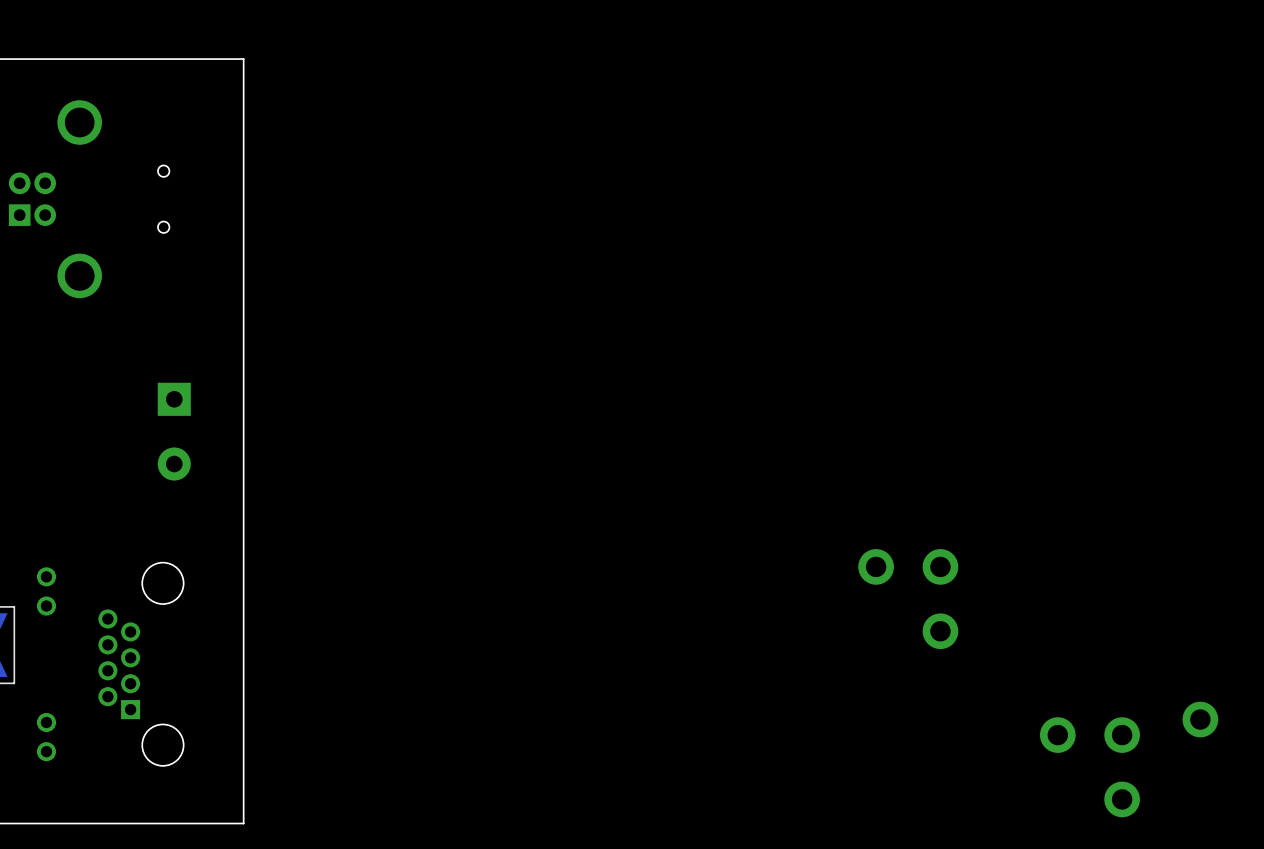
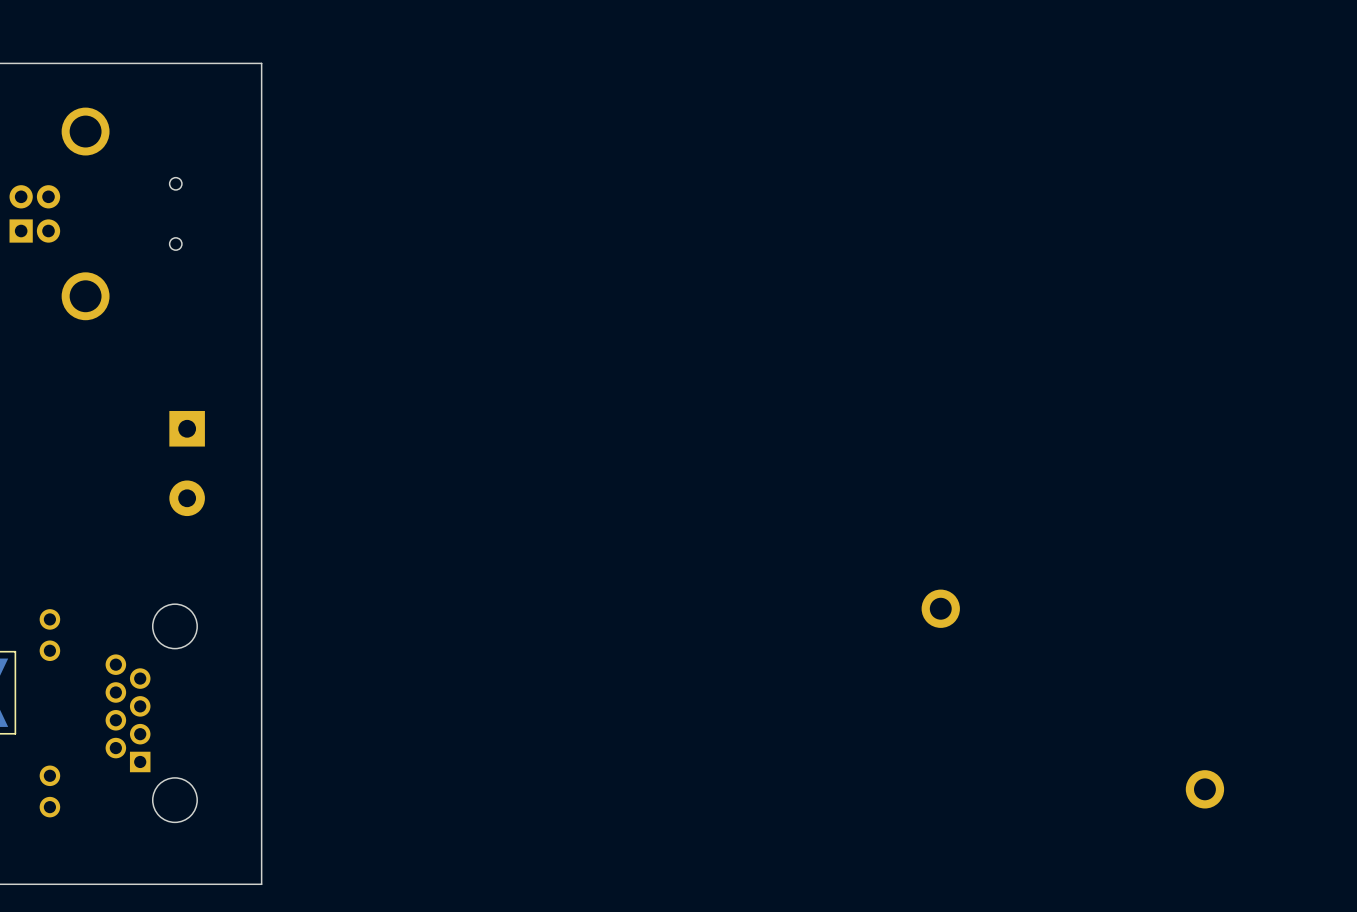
part: (940, 566) -> none
part: (940, 631) -> none
part: (1200, 719) -> none
part: (1057, 735) -> none
part: (1122, 799) -> none

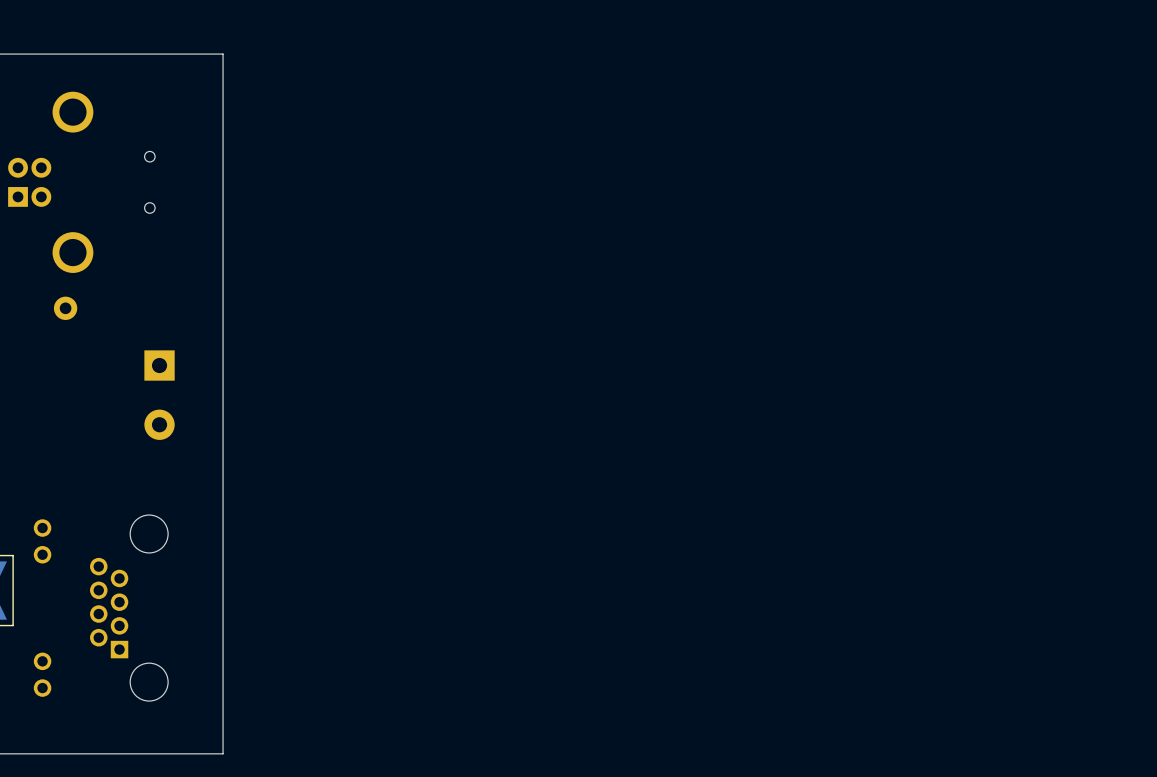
part: none -> (65, 308)
part: (940, 608) -> none
part: (1204, 789) -> none

